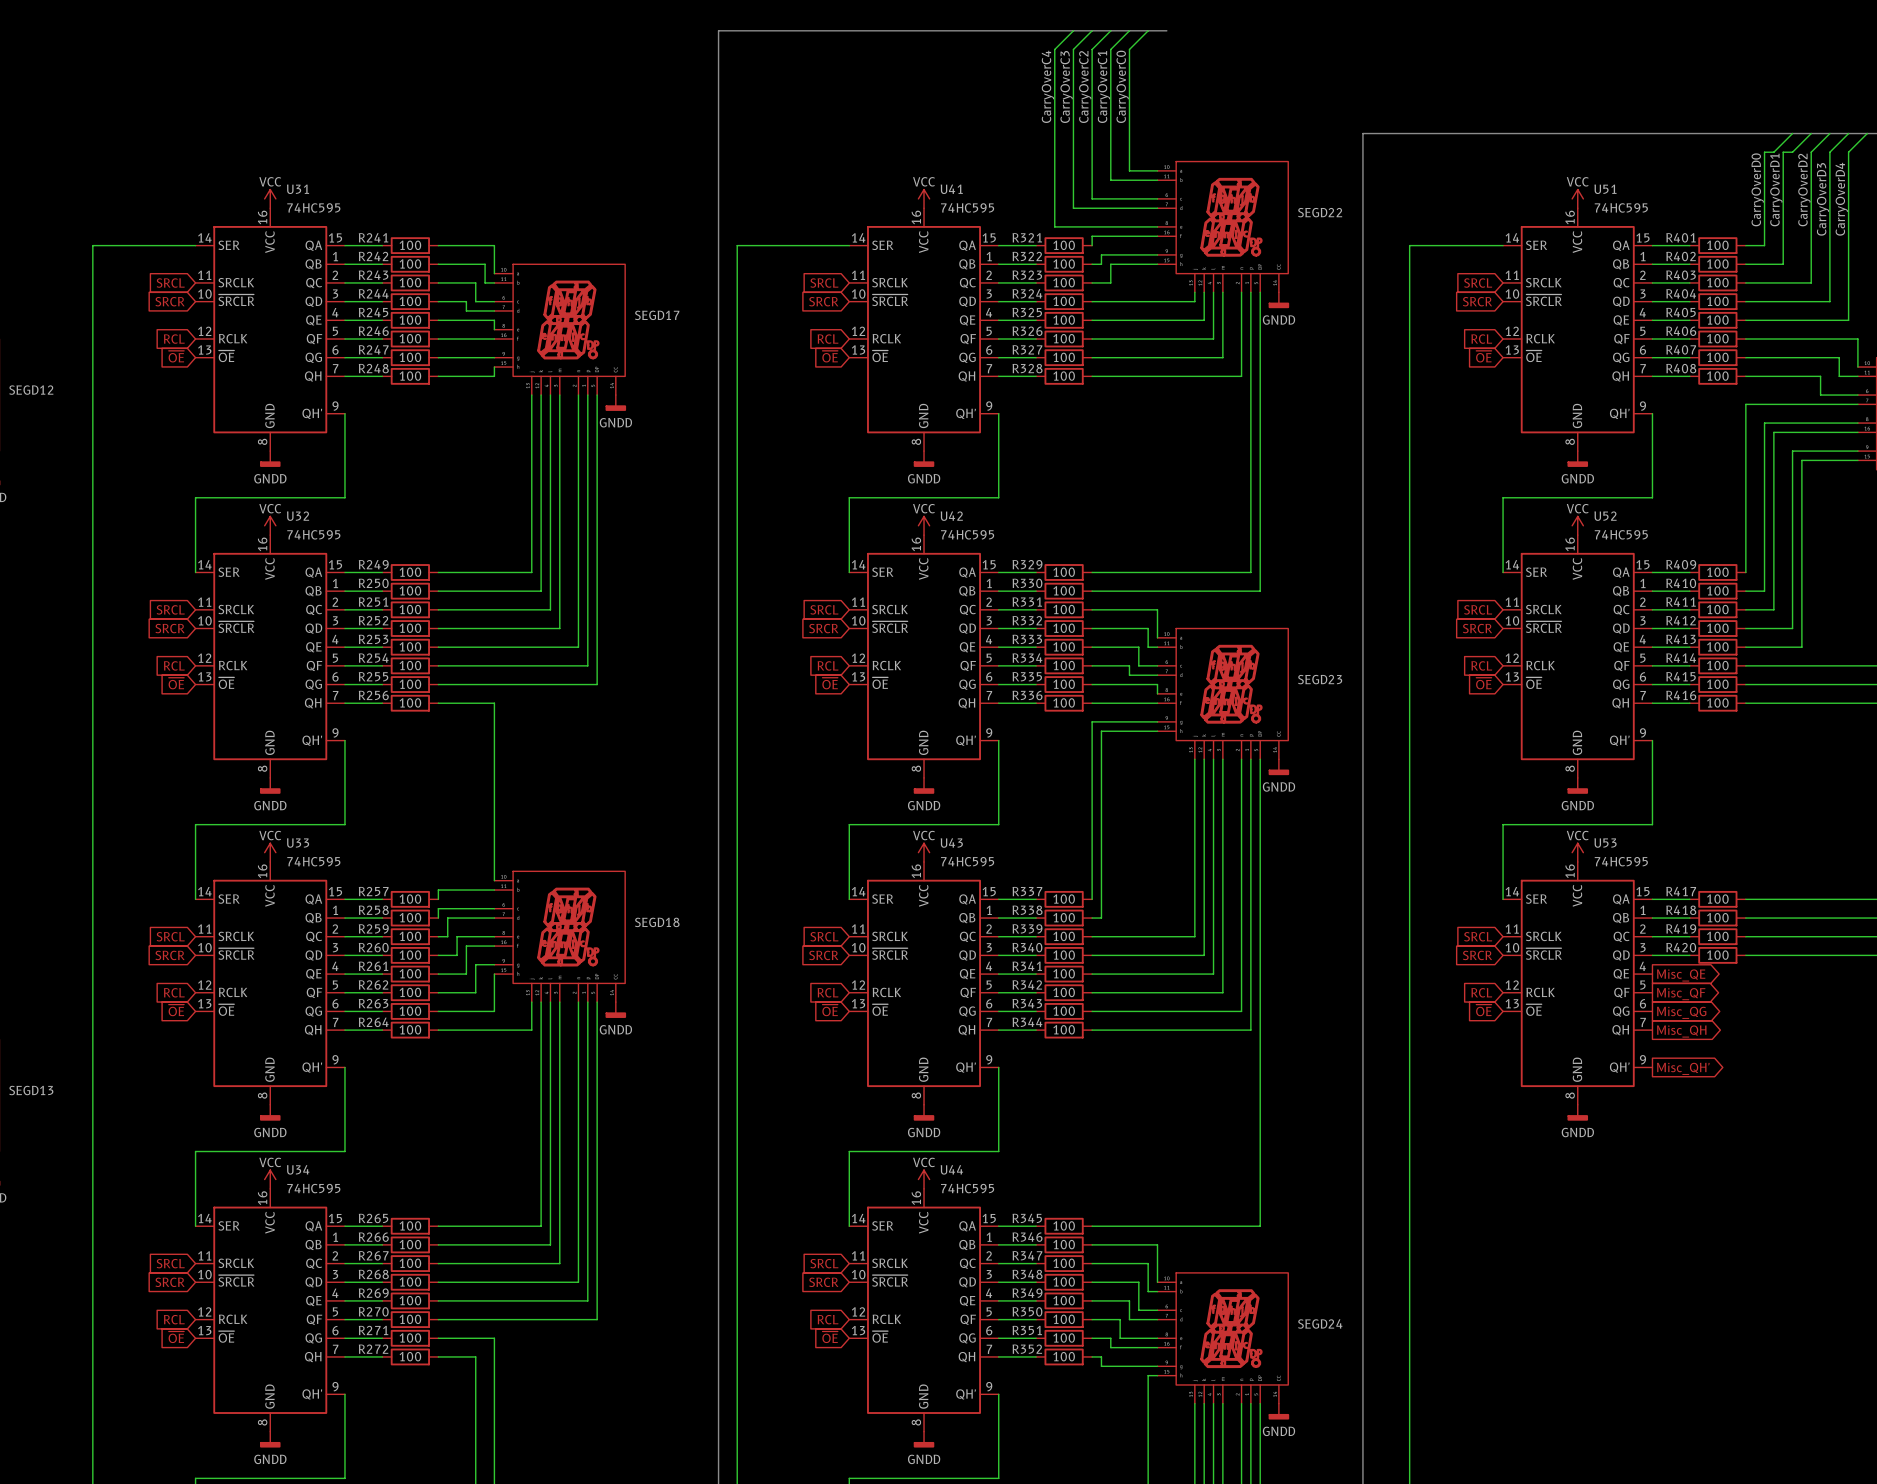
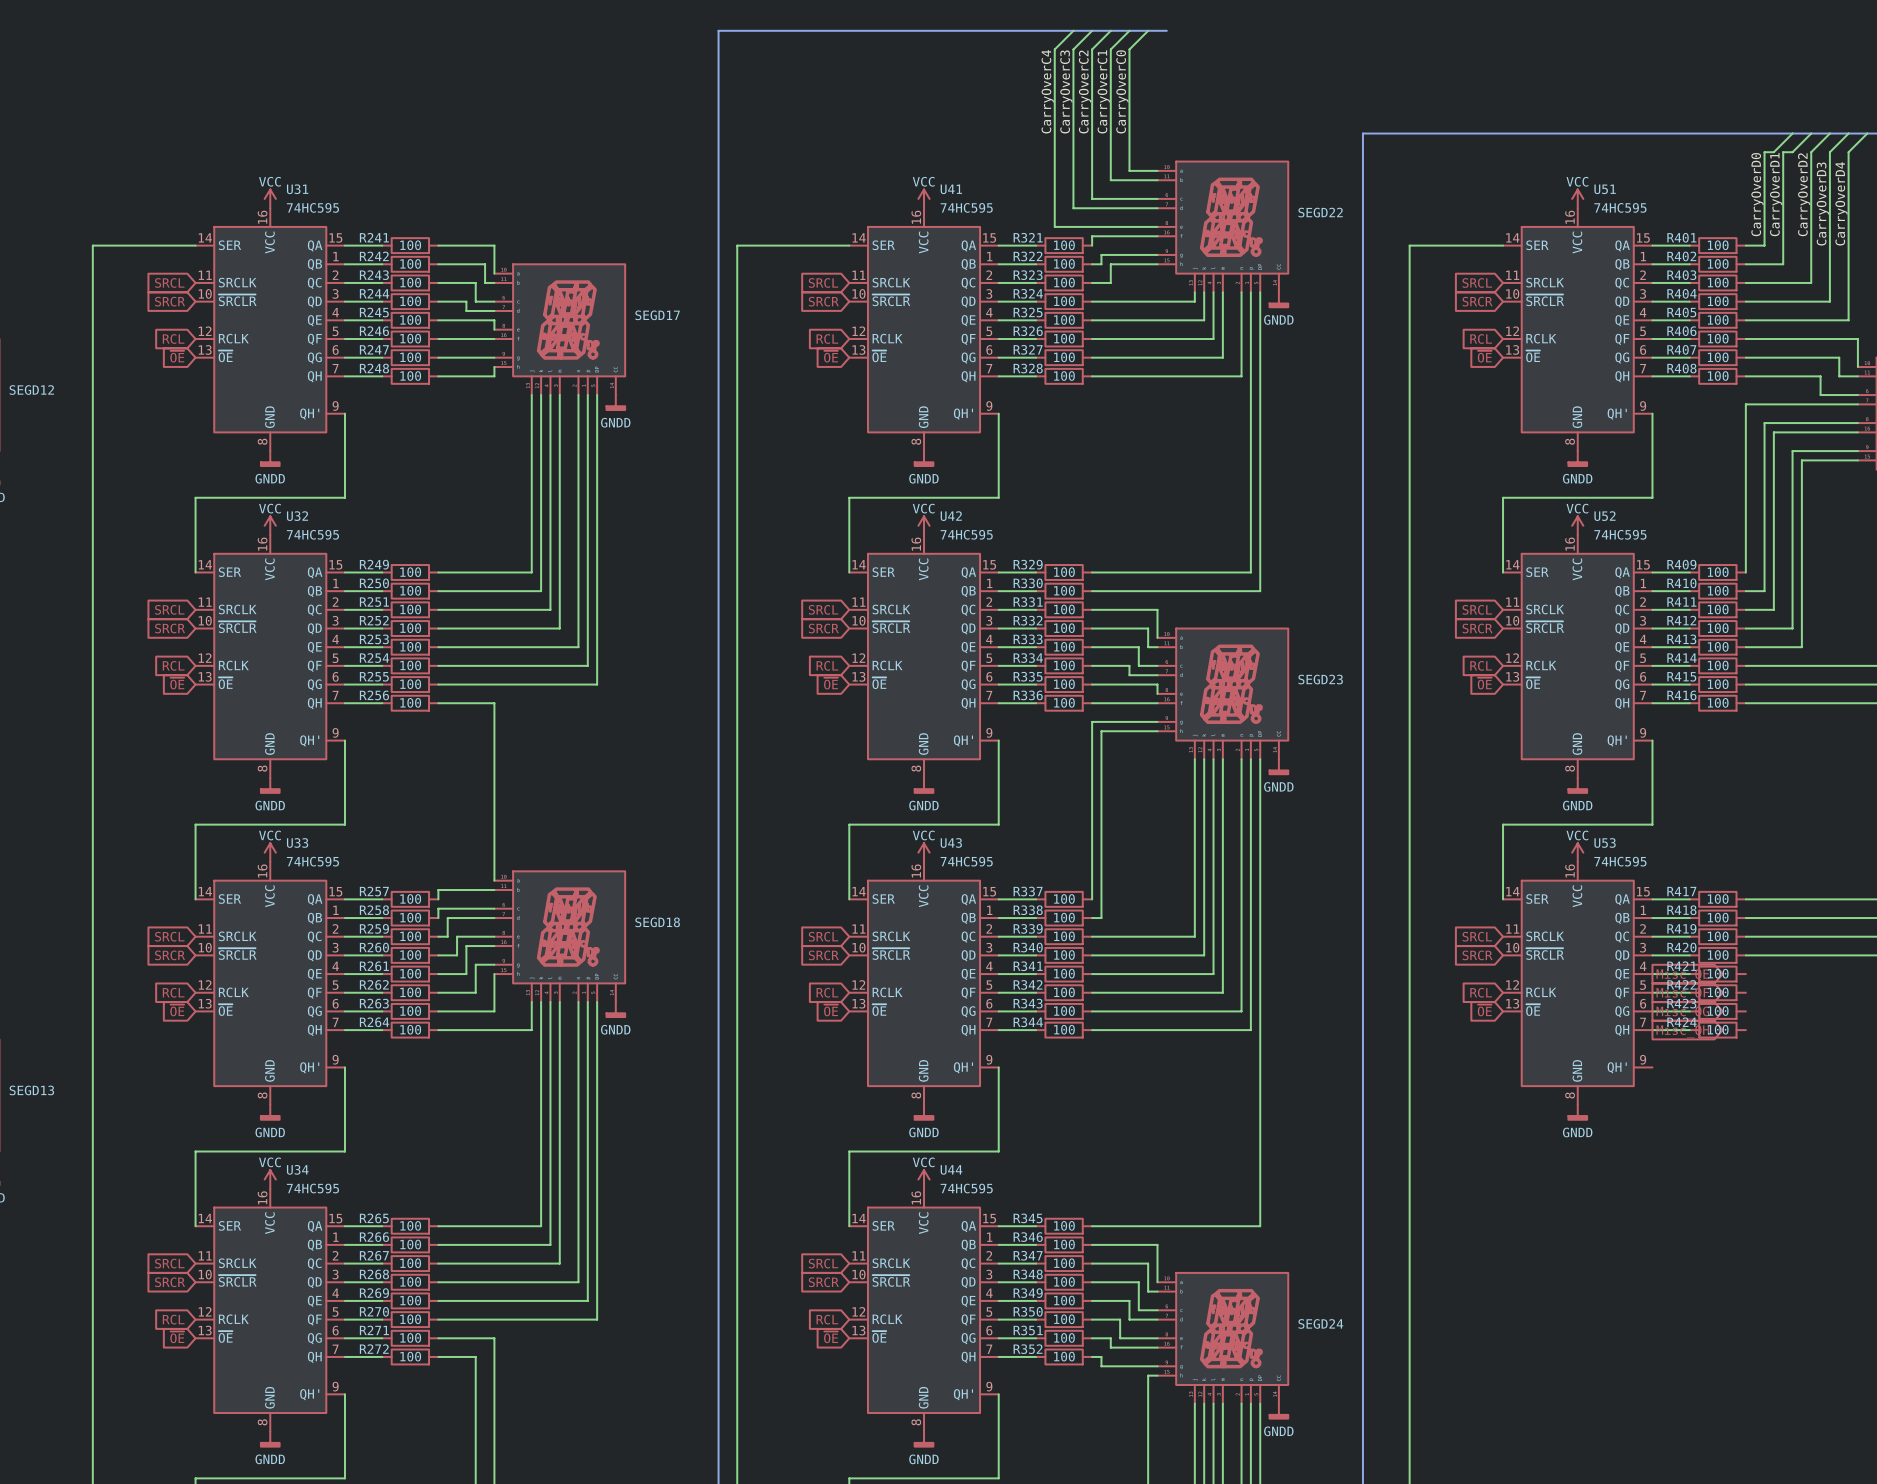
wire: none -> (1652, 974) (1689, 974)
R421: none -> 100 (1717, 974)
wire: none -> (1652, 992) (1689, 992)
R422: none -> 100 (1717, 992)
wire: none -> (1652, 1011) (1689, 1011)
R423: none -> 100 (1717, 1011)
wire: none -> (1652, 1030) (1689, 1030)
R424: none -> 100 (1717, 1030)
global label: Misc_QH' (1683, 1068) -> none

